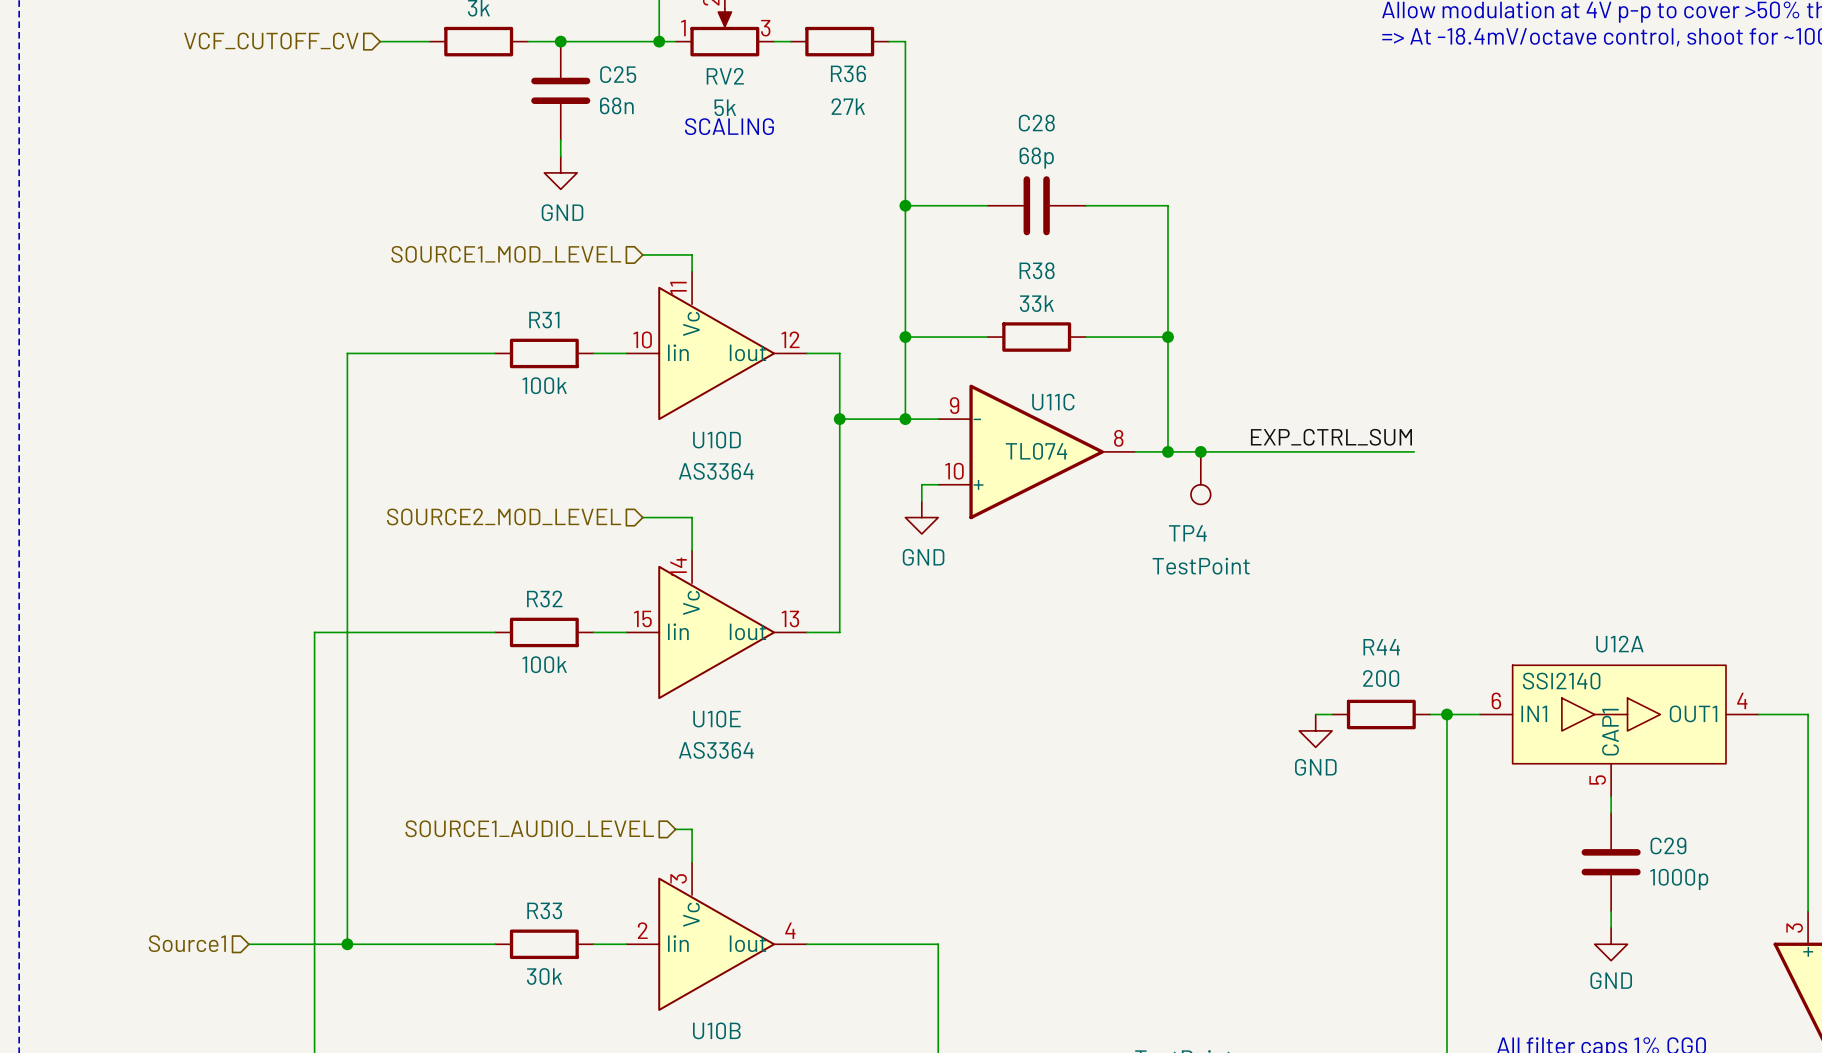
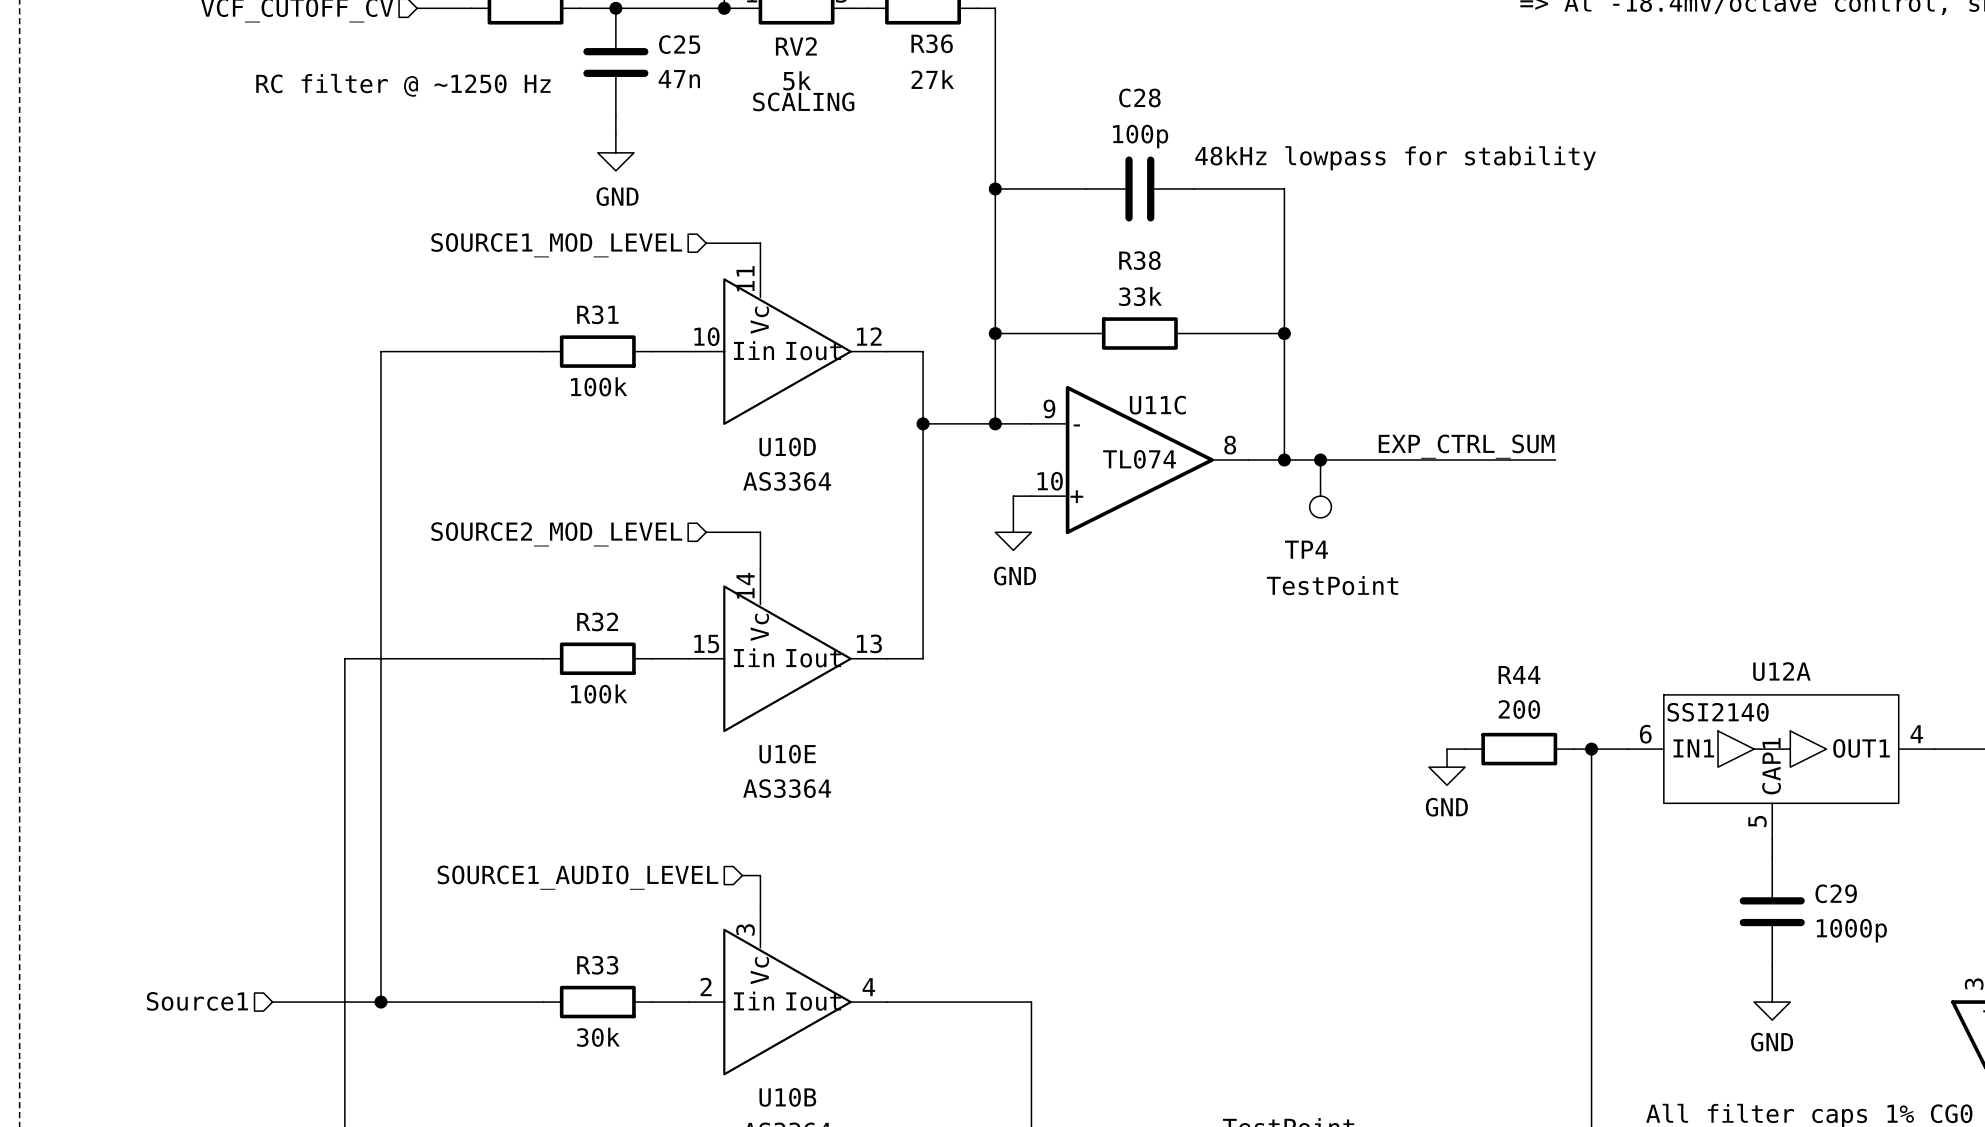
C25 value: 68n (616, 105) -> 47n (679, 79)
text: none -> RC filter @ ~1250 Hz (403, 85)
C28 value: 68p (1036, 158) -> 100p (1140, 136)
text: none -> 48kHz lowpass for stability (1395, 158)

